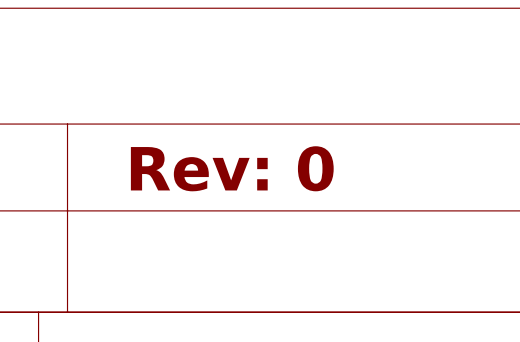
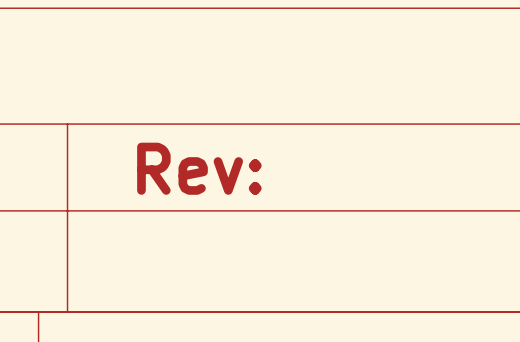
title block: Rev: 0 (232, 168) -> Rev: (199, 168)

